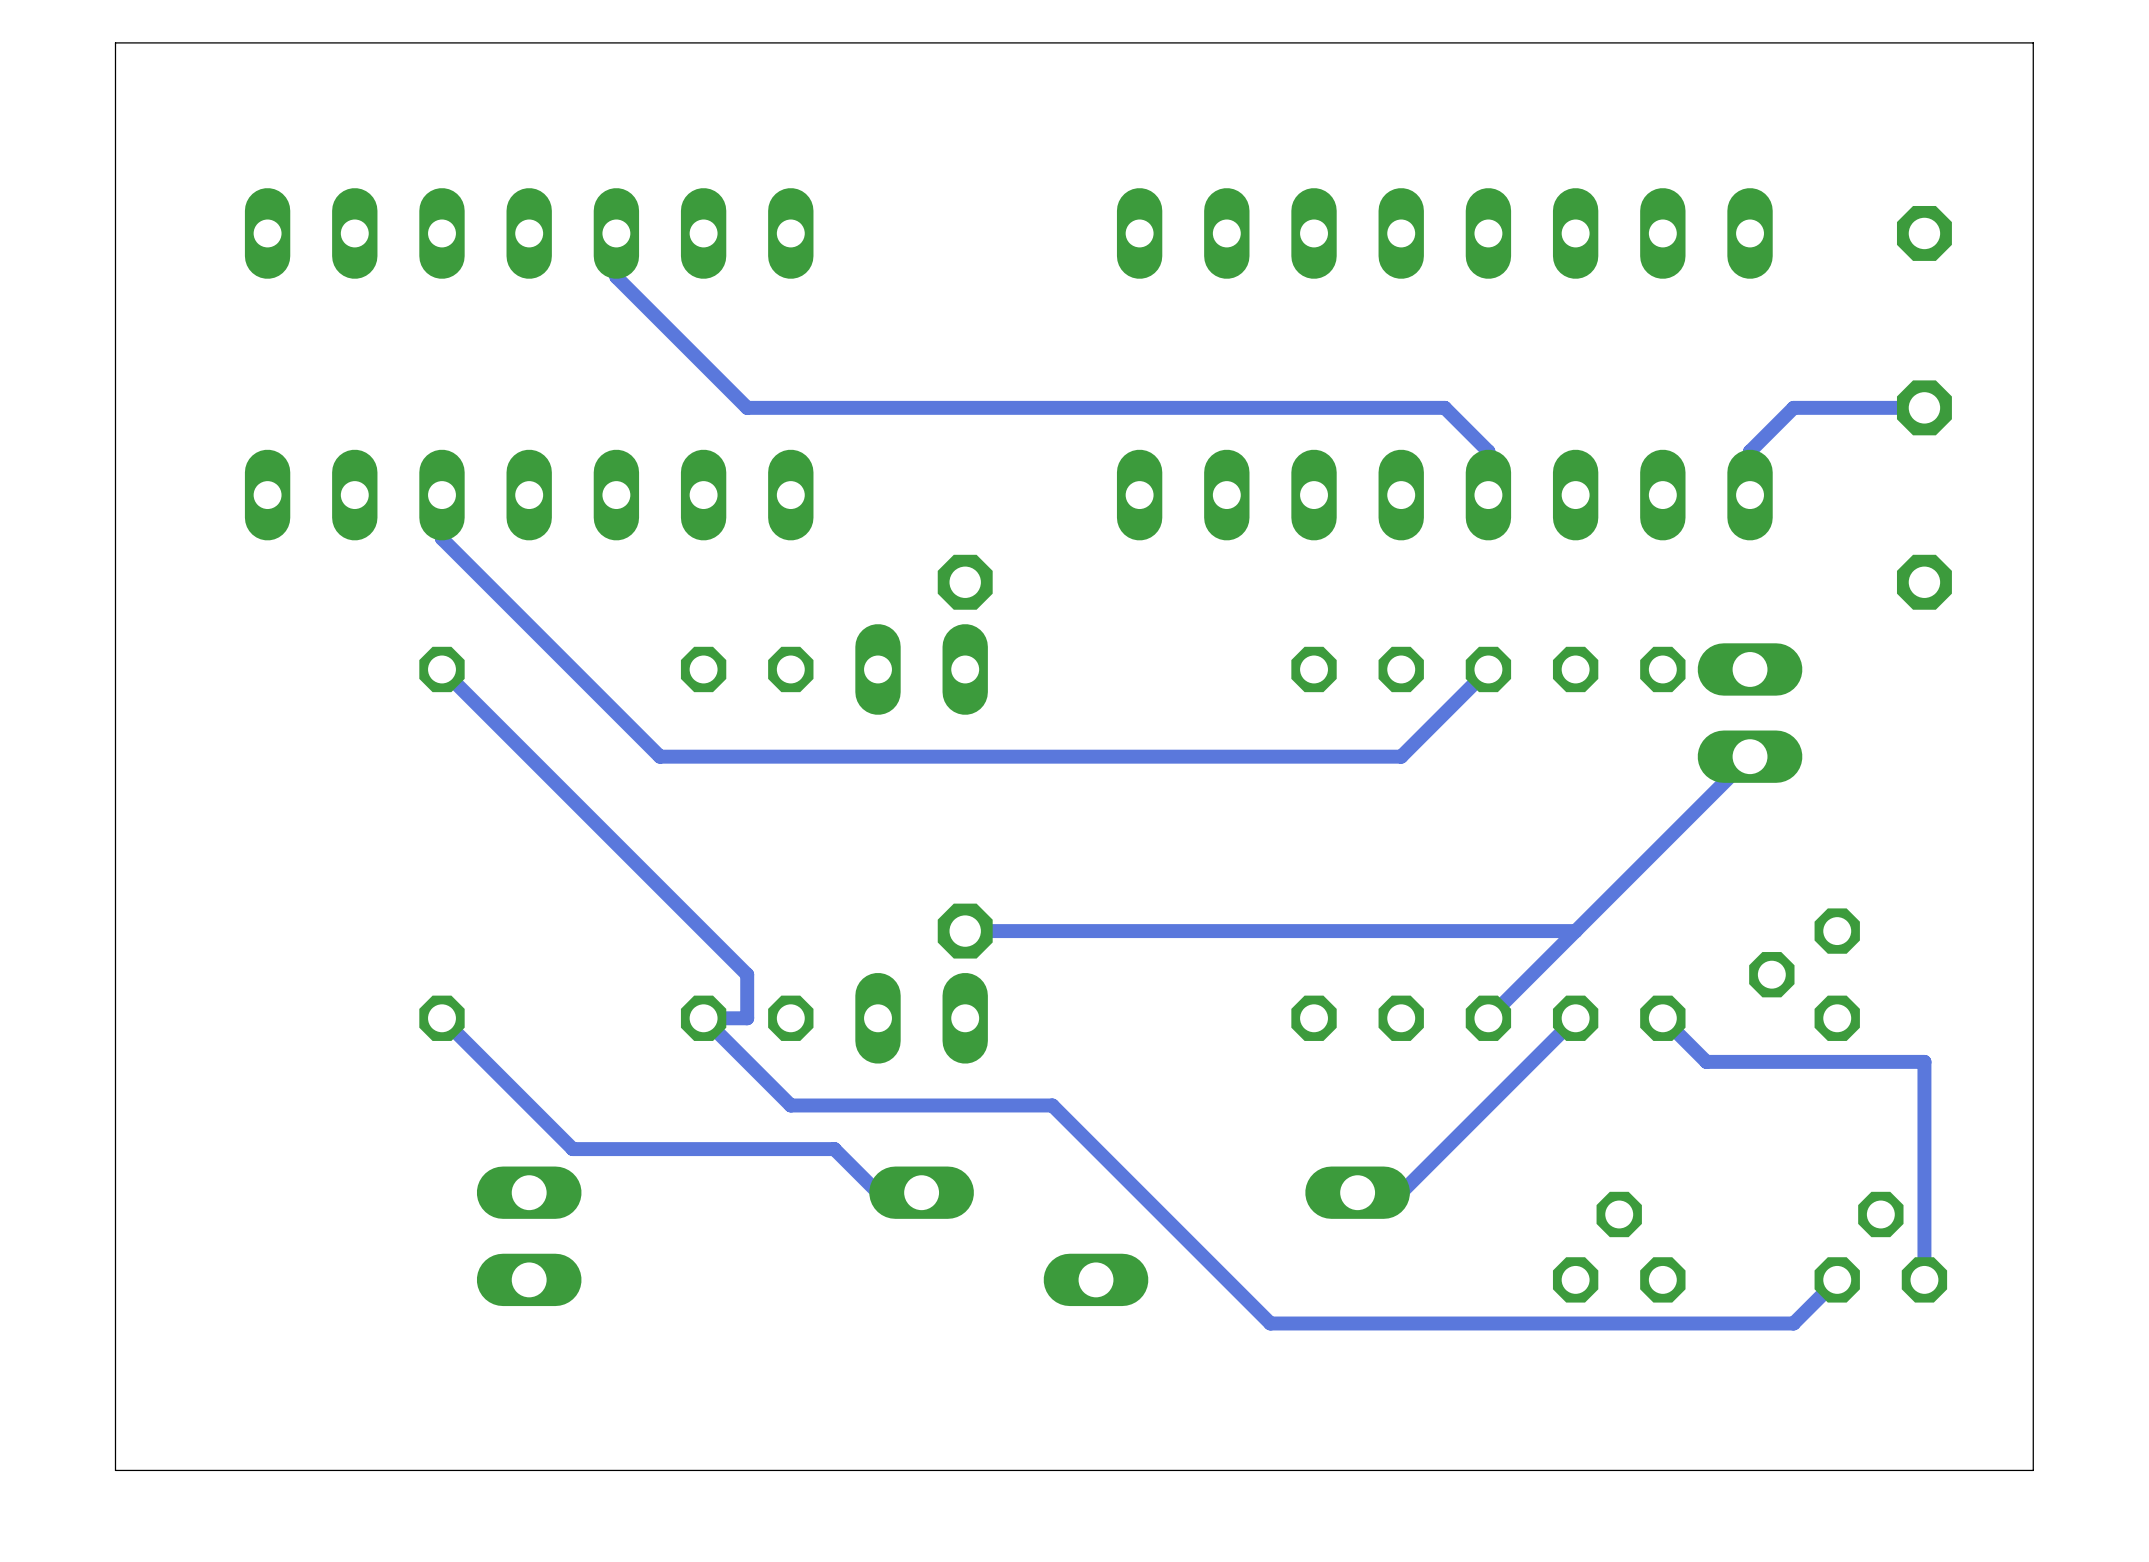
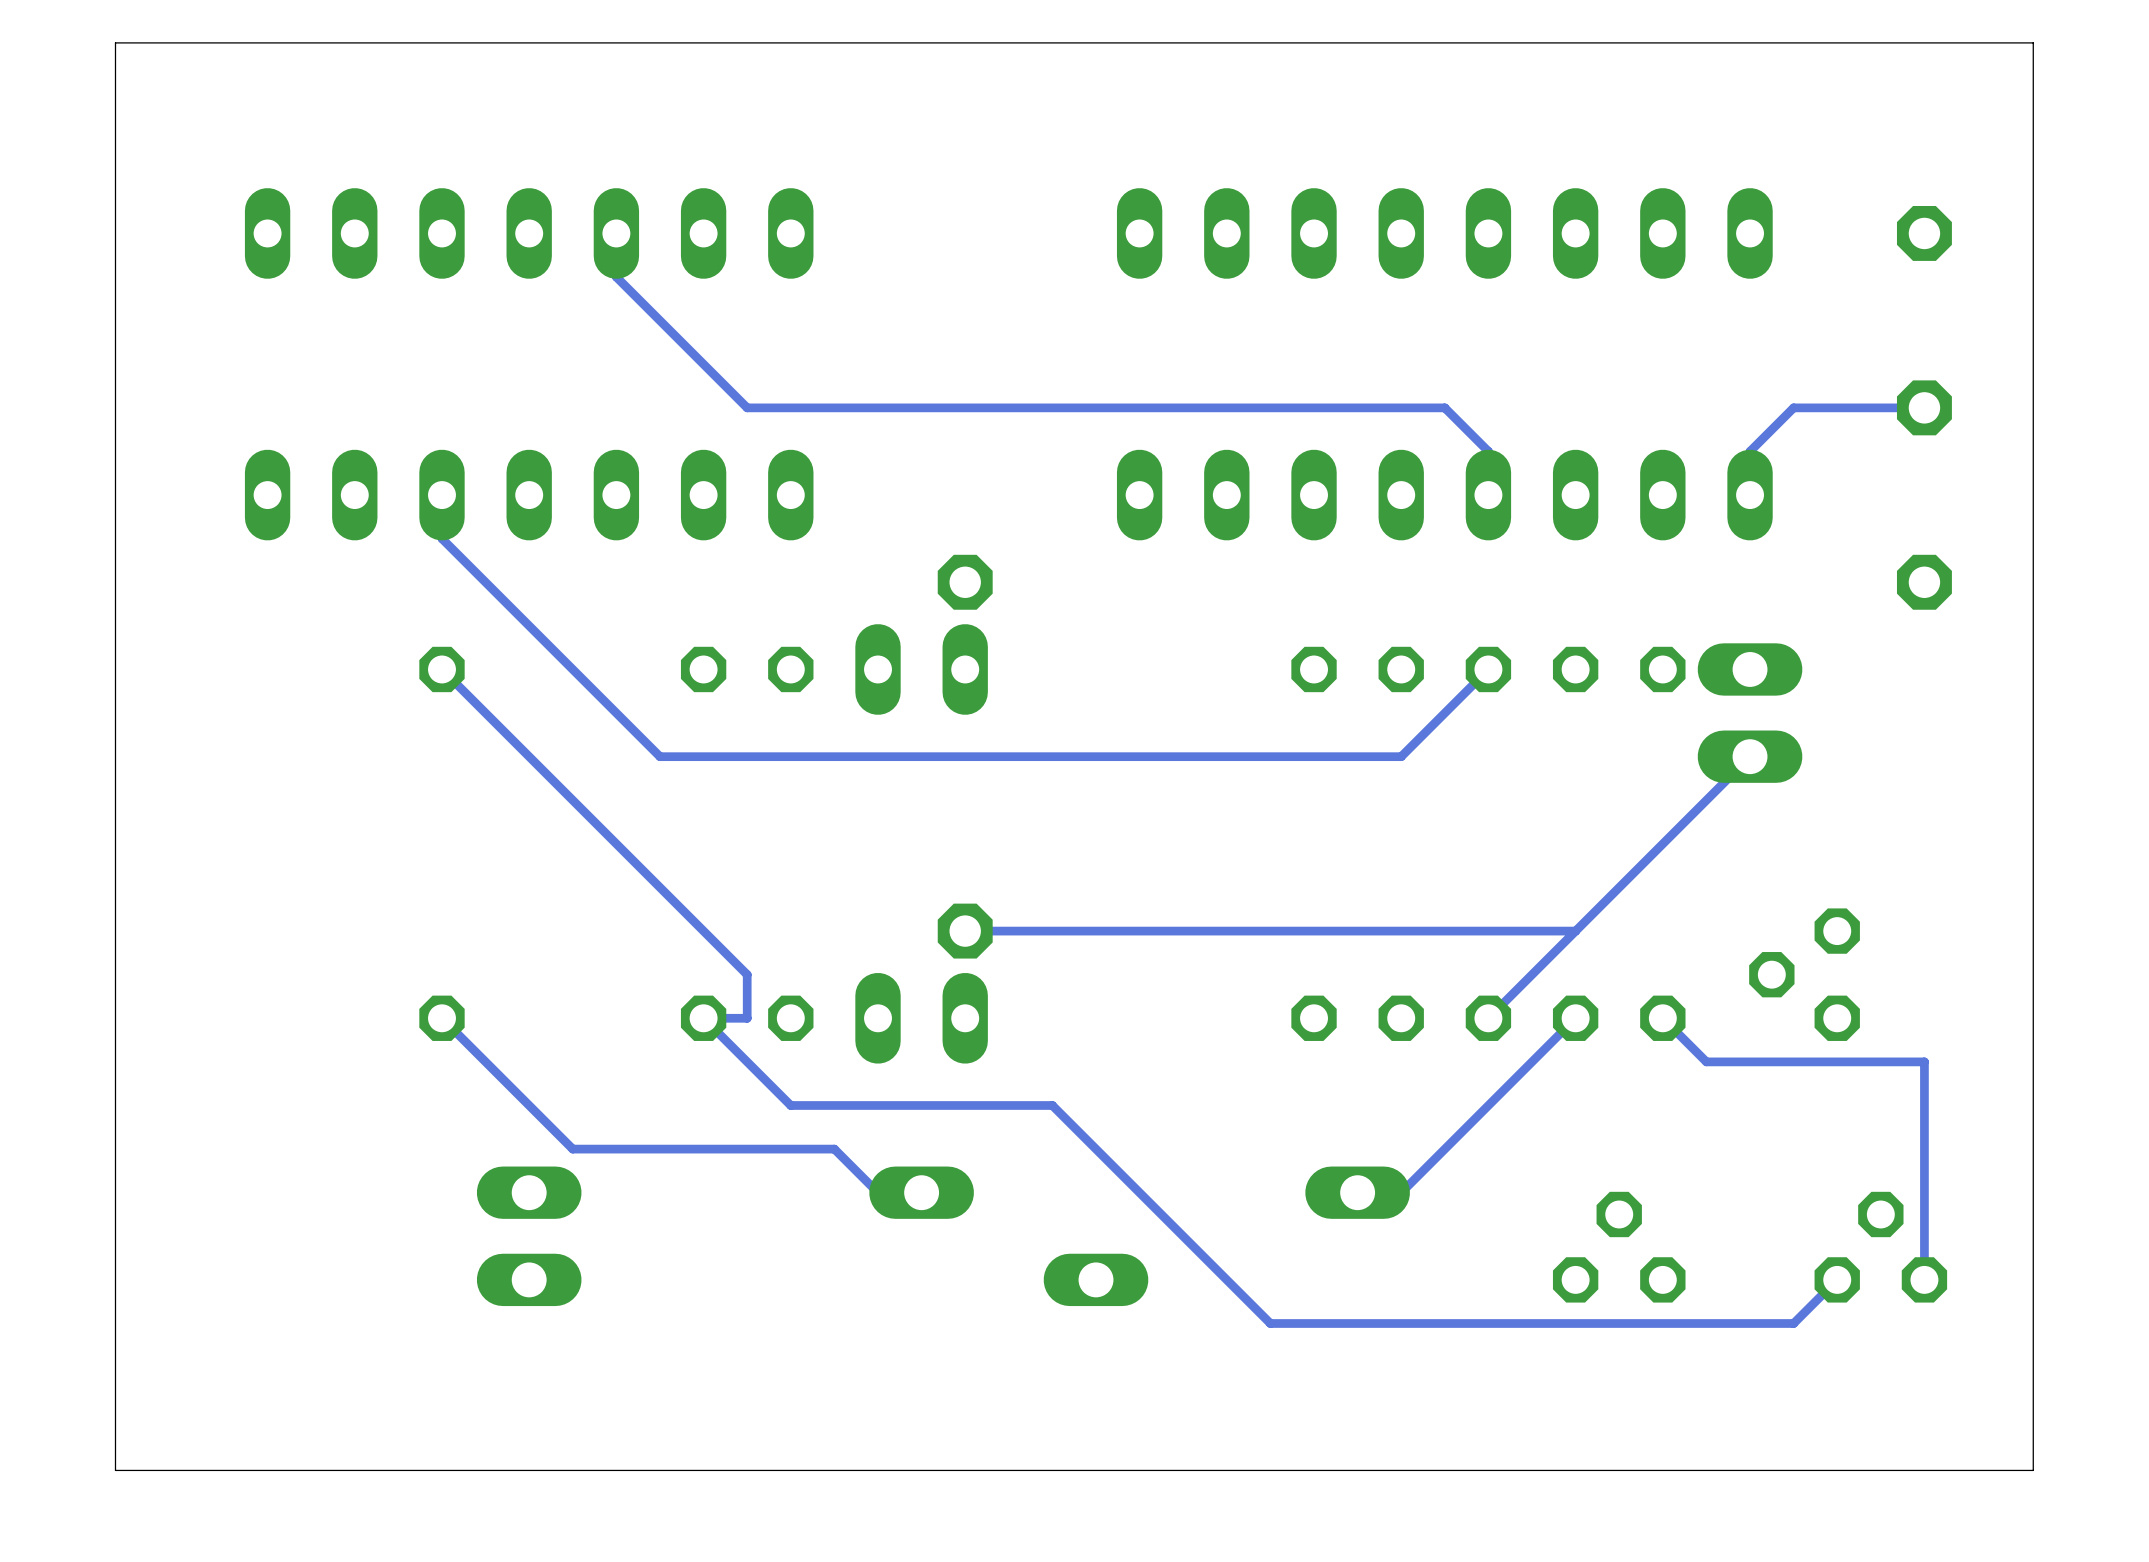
track width: thick (616, 233) (616, 277) (747, 407) (1444, 407) (1488, 451) (1488, 495) -> thin (616, 233) (616, 277) (747, 407) (1444, 407) (1488, 451) (1488, 495)
track width: thick (1924, 407) (1793, 407) (1750, 451) (1750, 495) -> thin (1924, 407) (1793, 407) (1750, 451) (1750, 495)
track width: thick (441, 495) (441, 538) (659, 756) (1401, 756) (1488, 669) -> thin (441, 495) (441, 538) (659, 756) (1401, 756) (1488, 669)
track width: thick (441, 669) (747, 974) (747, 1018) (703, 1018) (790, 1105) (1052, 1105) (1270, 1323) (1793, 1323) (1837, 1279) -> thin (441, 669) (747, 974) (747, 1018) (703, 1018) (790, 1105) (1052, 1105) (1270, 1323) (1793, 1323) (1837, 1279)
track width: thick (1750, 756) (1488, 1018) -> thin (1750, 756) (1488, 1018)
track width: thick (1575, 931) (965, 931) -> thin (1575, 931) (965, 931)
track width: thick (441, 1018) (572, 1149) (834, 1149) (878, 1192) (921, 1192) -> thin (441, 1018) (572, 1149) (834, 1149) (878, 1192) (921, 1192)
track width: thick (1575, 1018) (1401, 1192) (1357, 1192) -> thin (1575, 1018) (1401, 1192) (1357, 1192)
track width: thick (1662, 1018) (1706, 1061) (1924, 1061) (1924, 1279) -> thin (1662, 1018) (1706, 1061) (1924, 1061) (1924, 1279)

